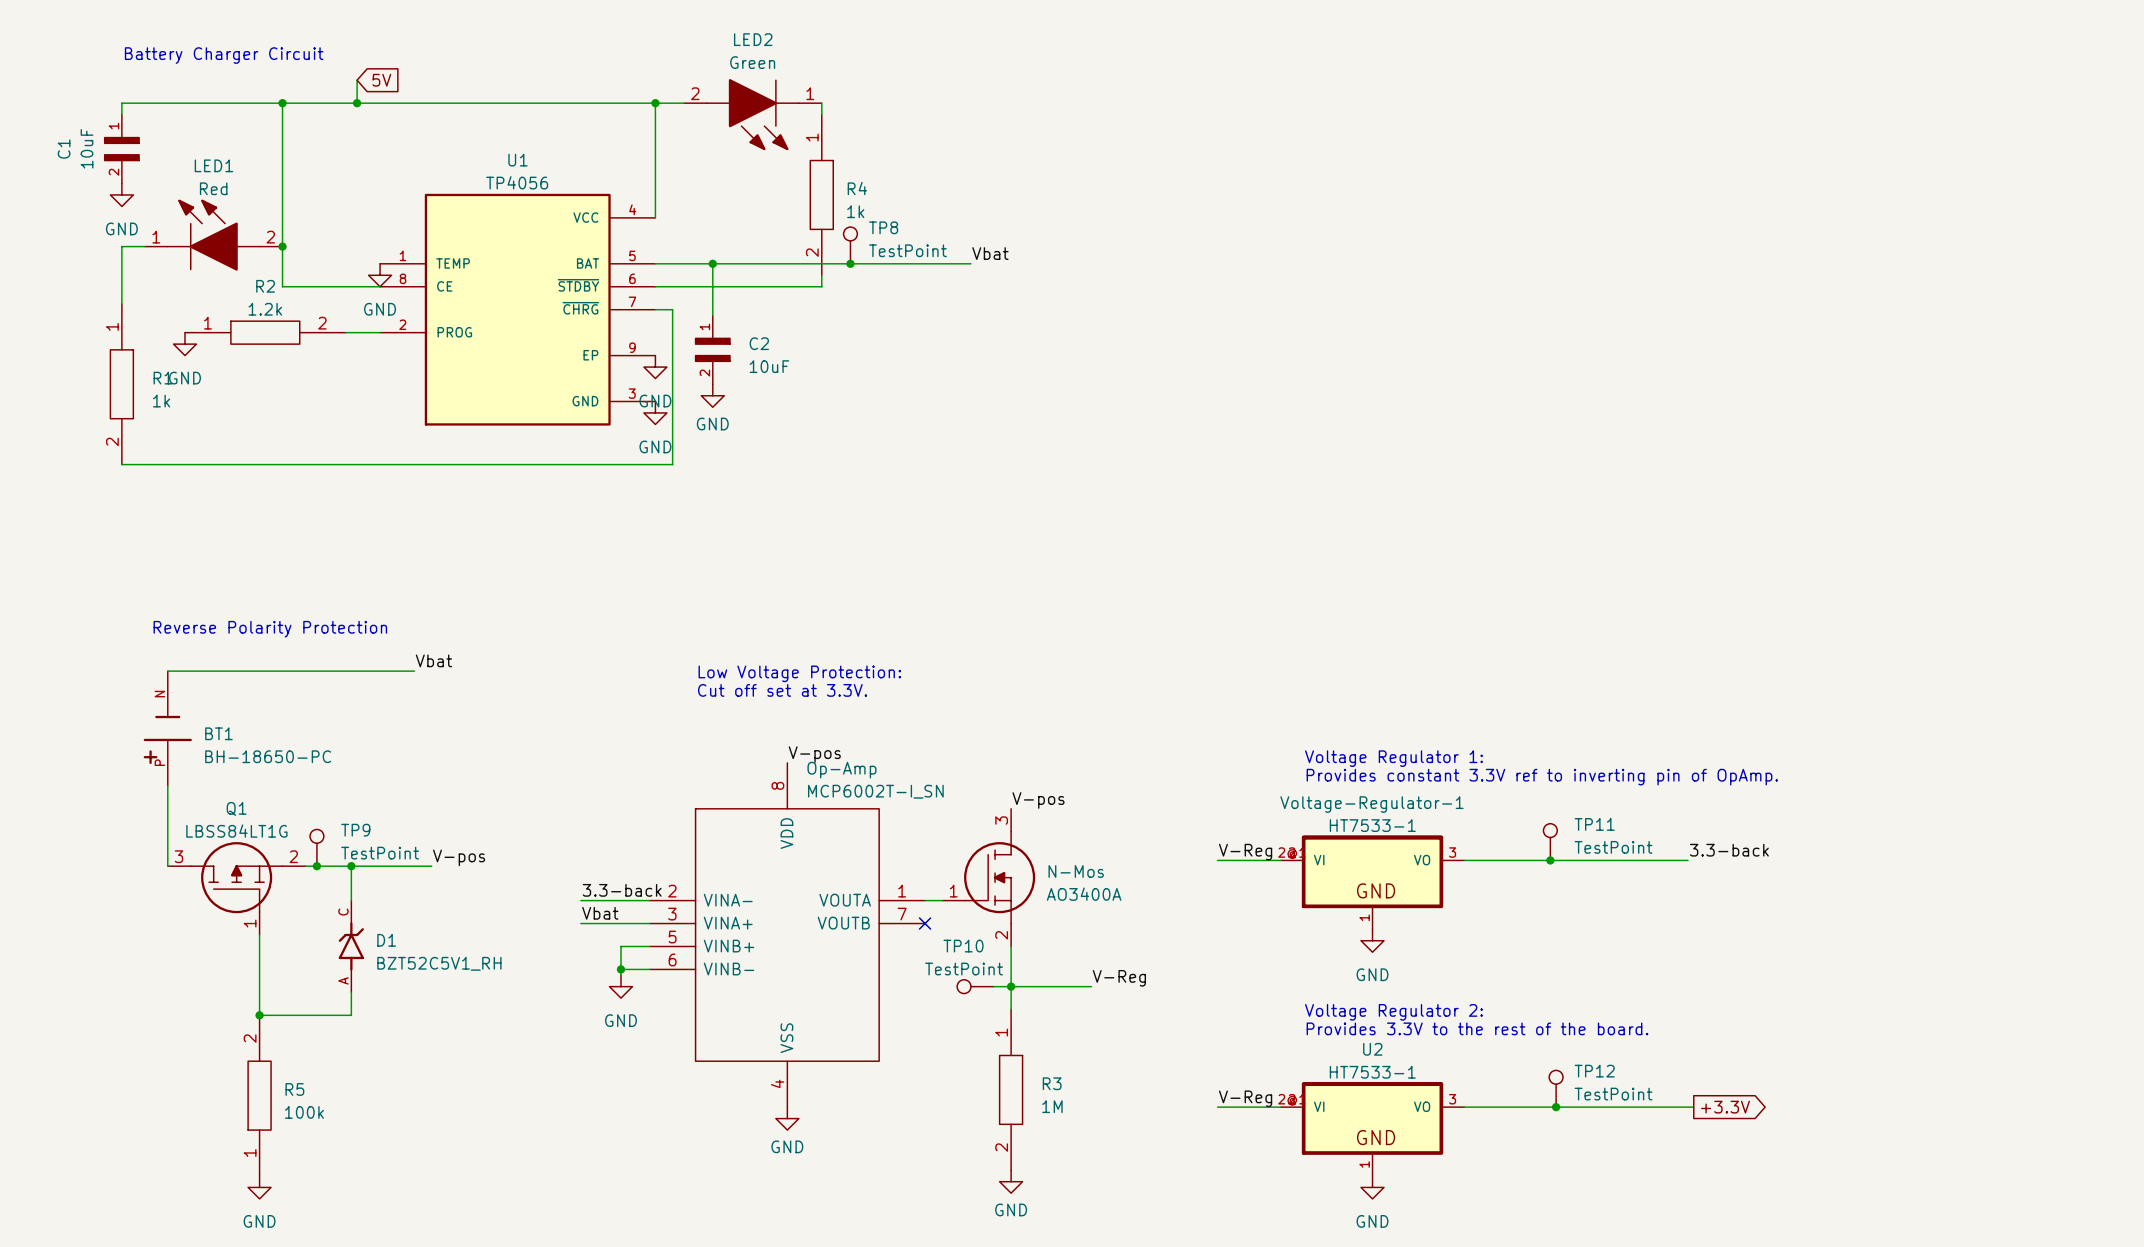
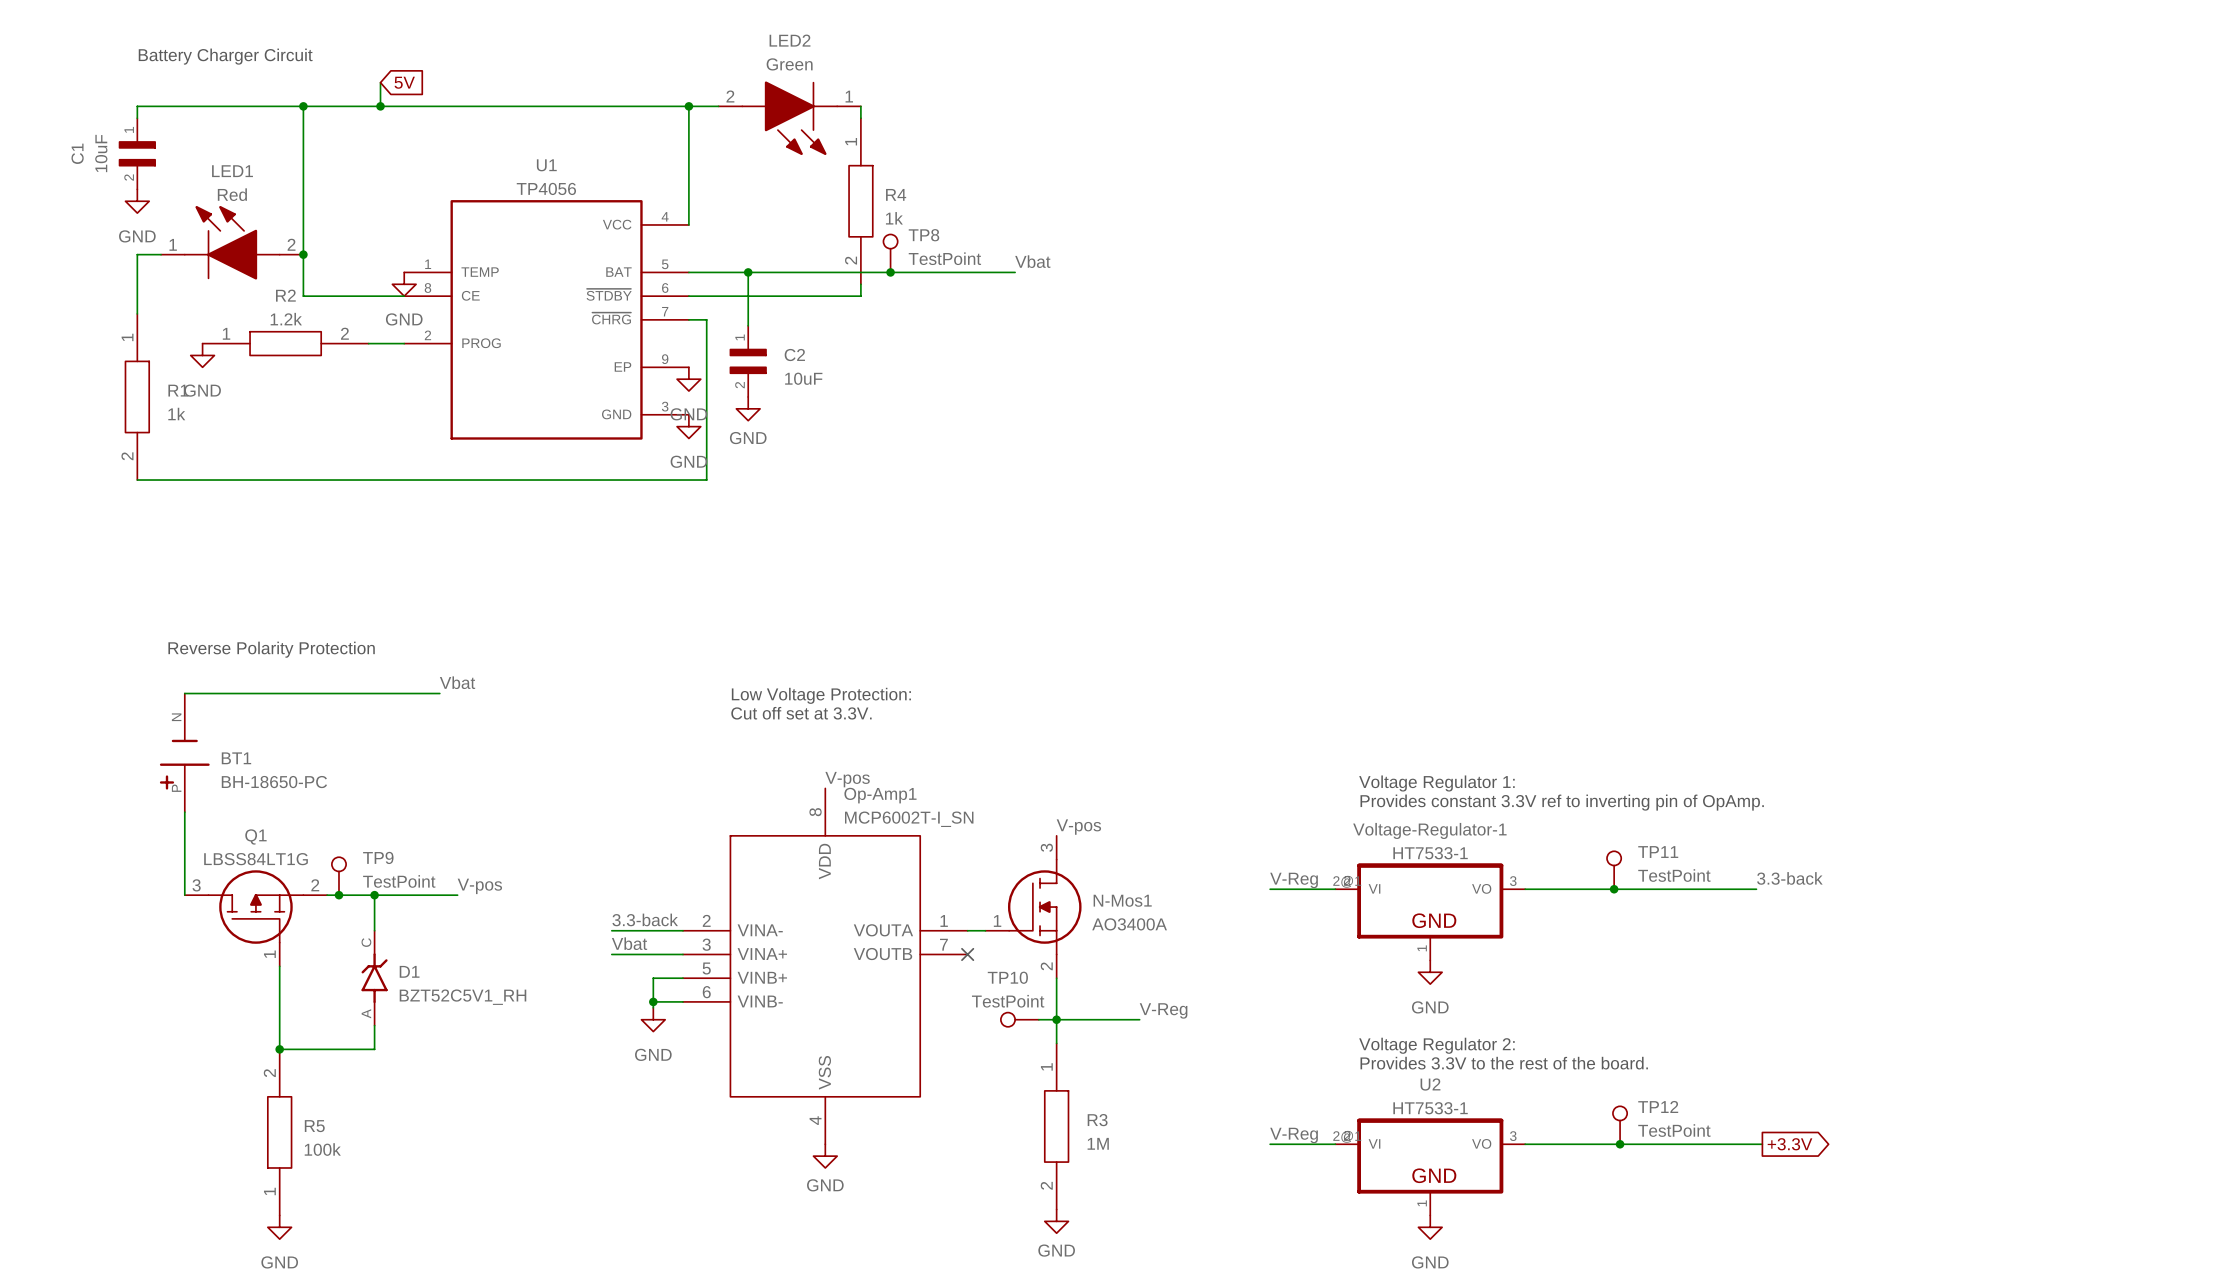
Op-Amp name: Op-Amp (841, 770) -> Op-Amp1 (880, 795)
N-Mos name: N-Mos (1076, 871) -> N-Mos1 (1122, 900)

